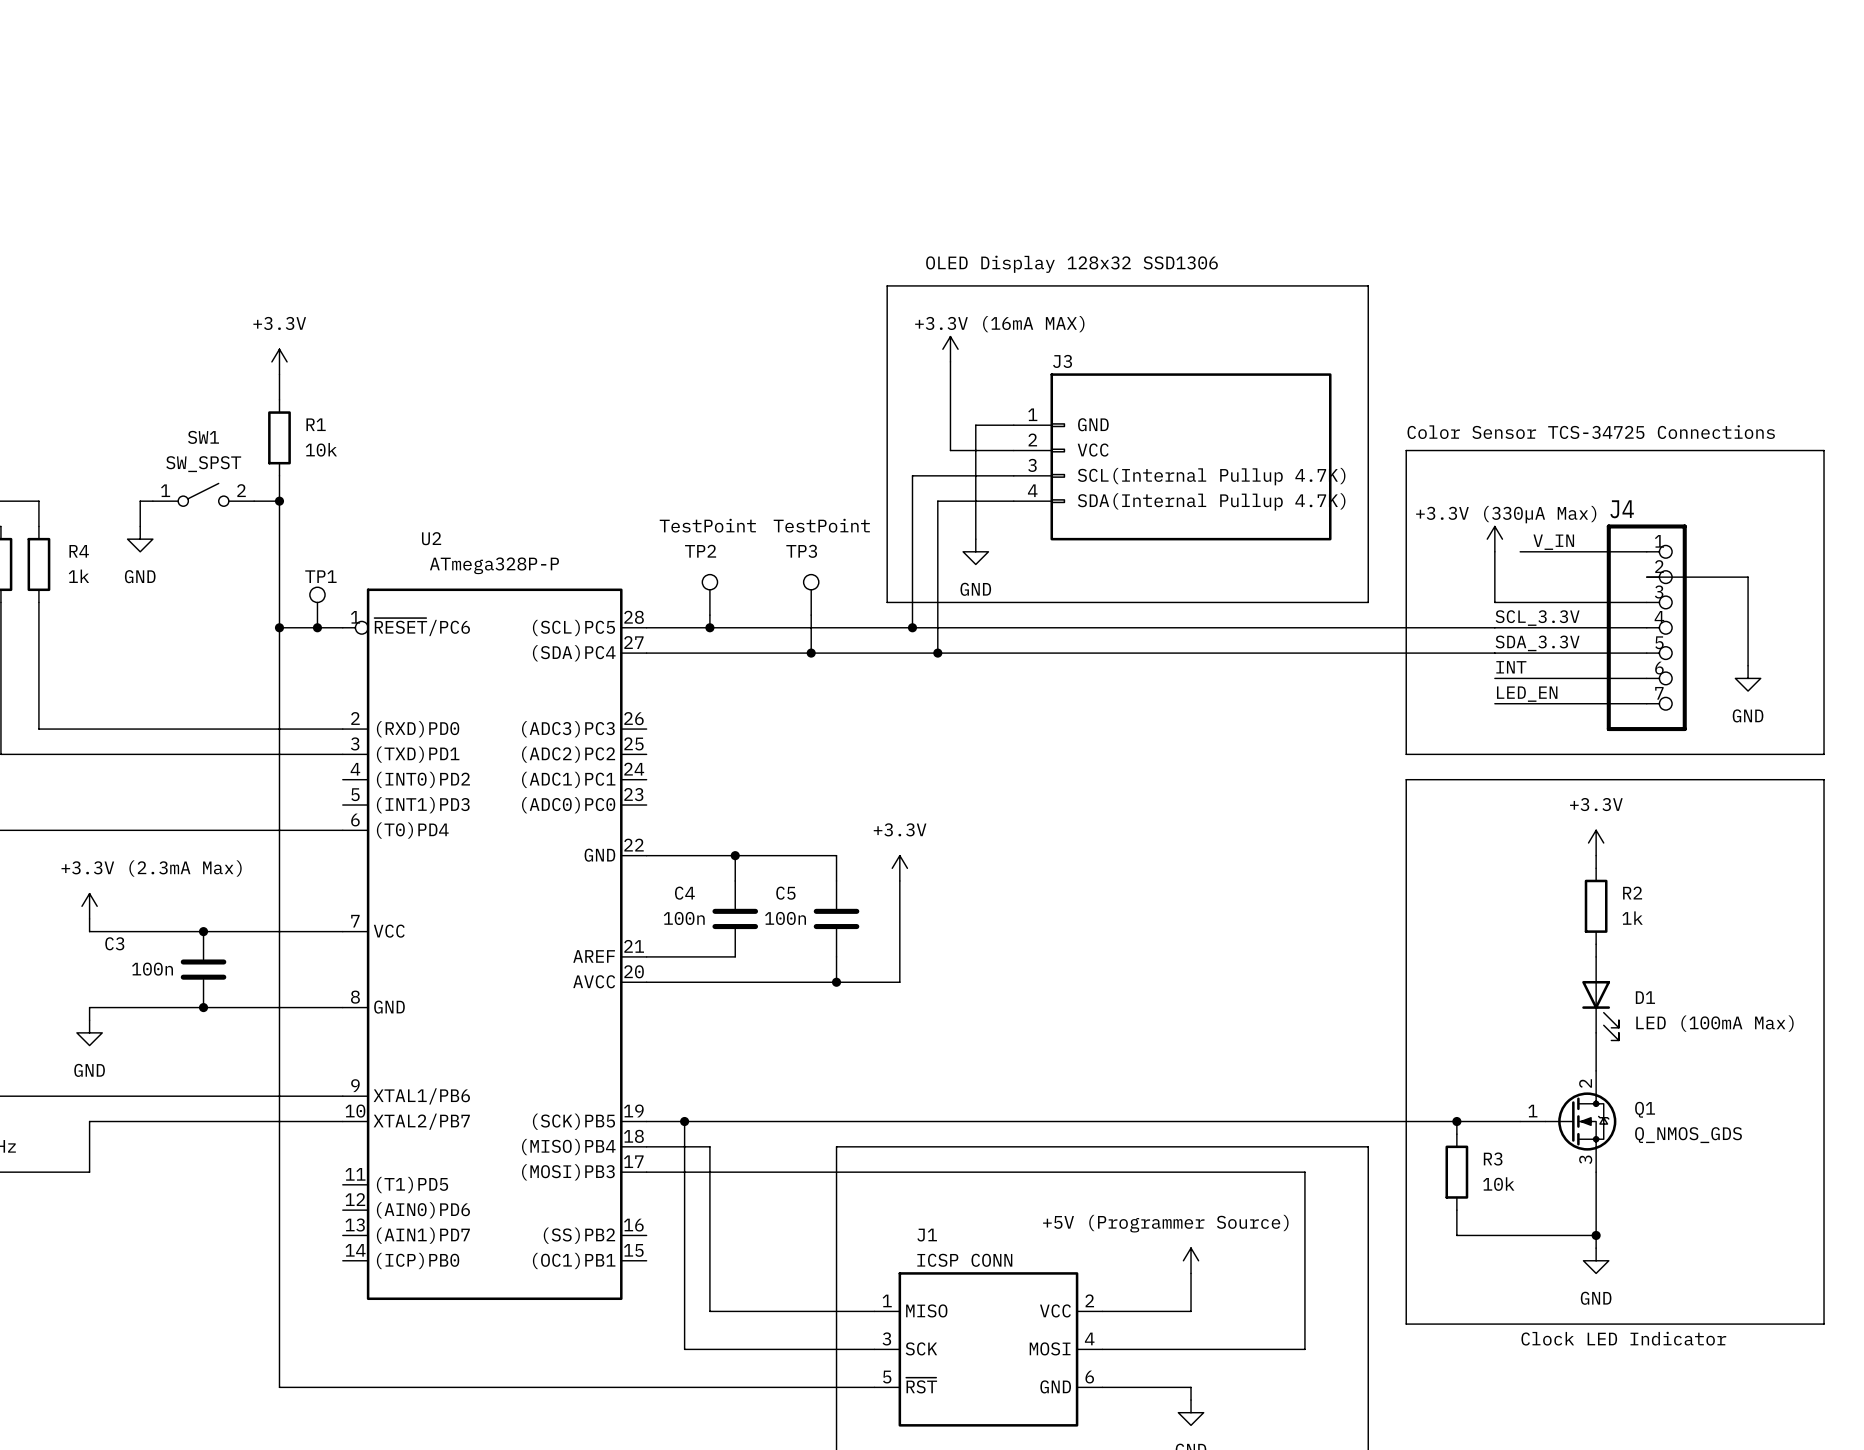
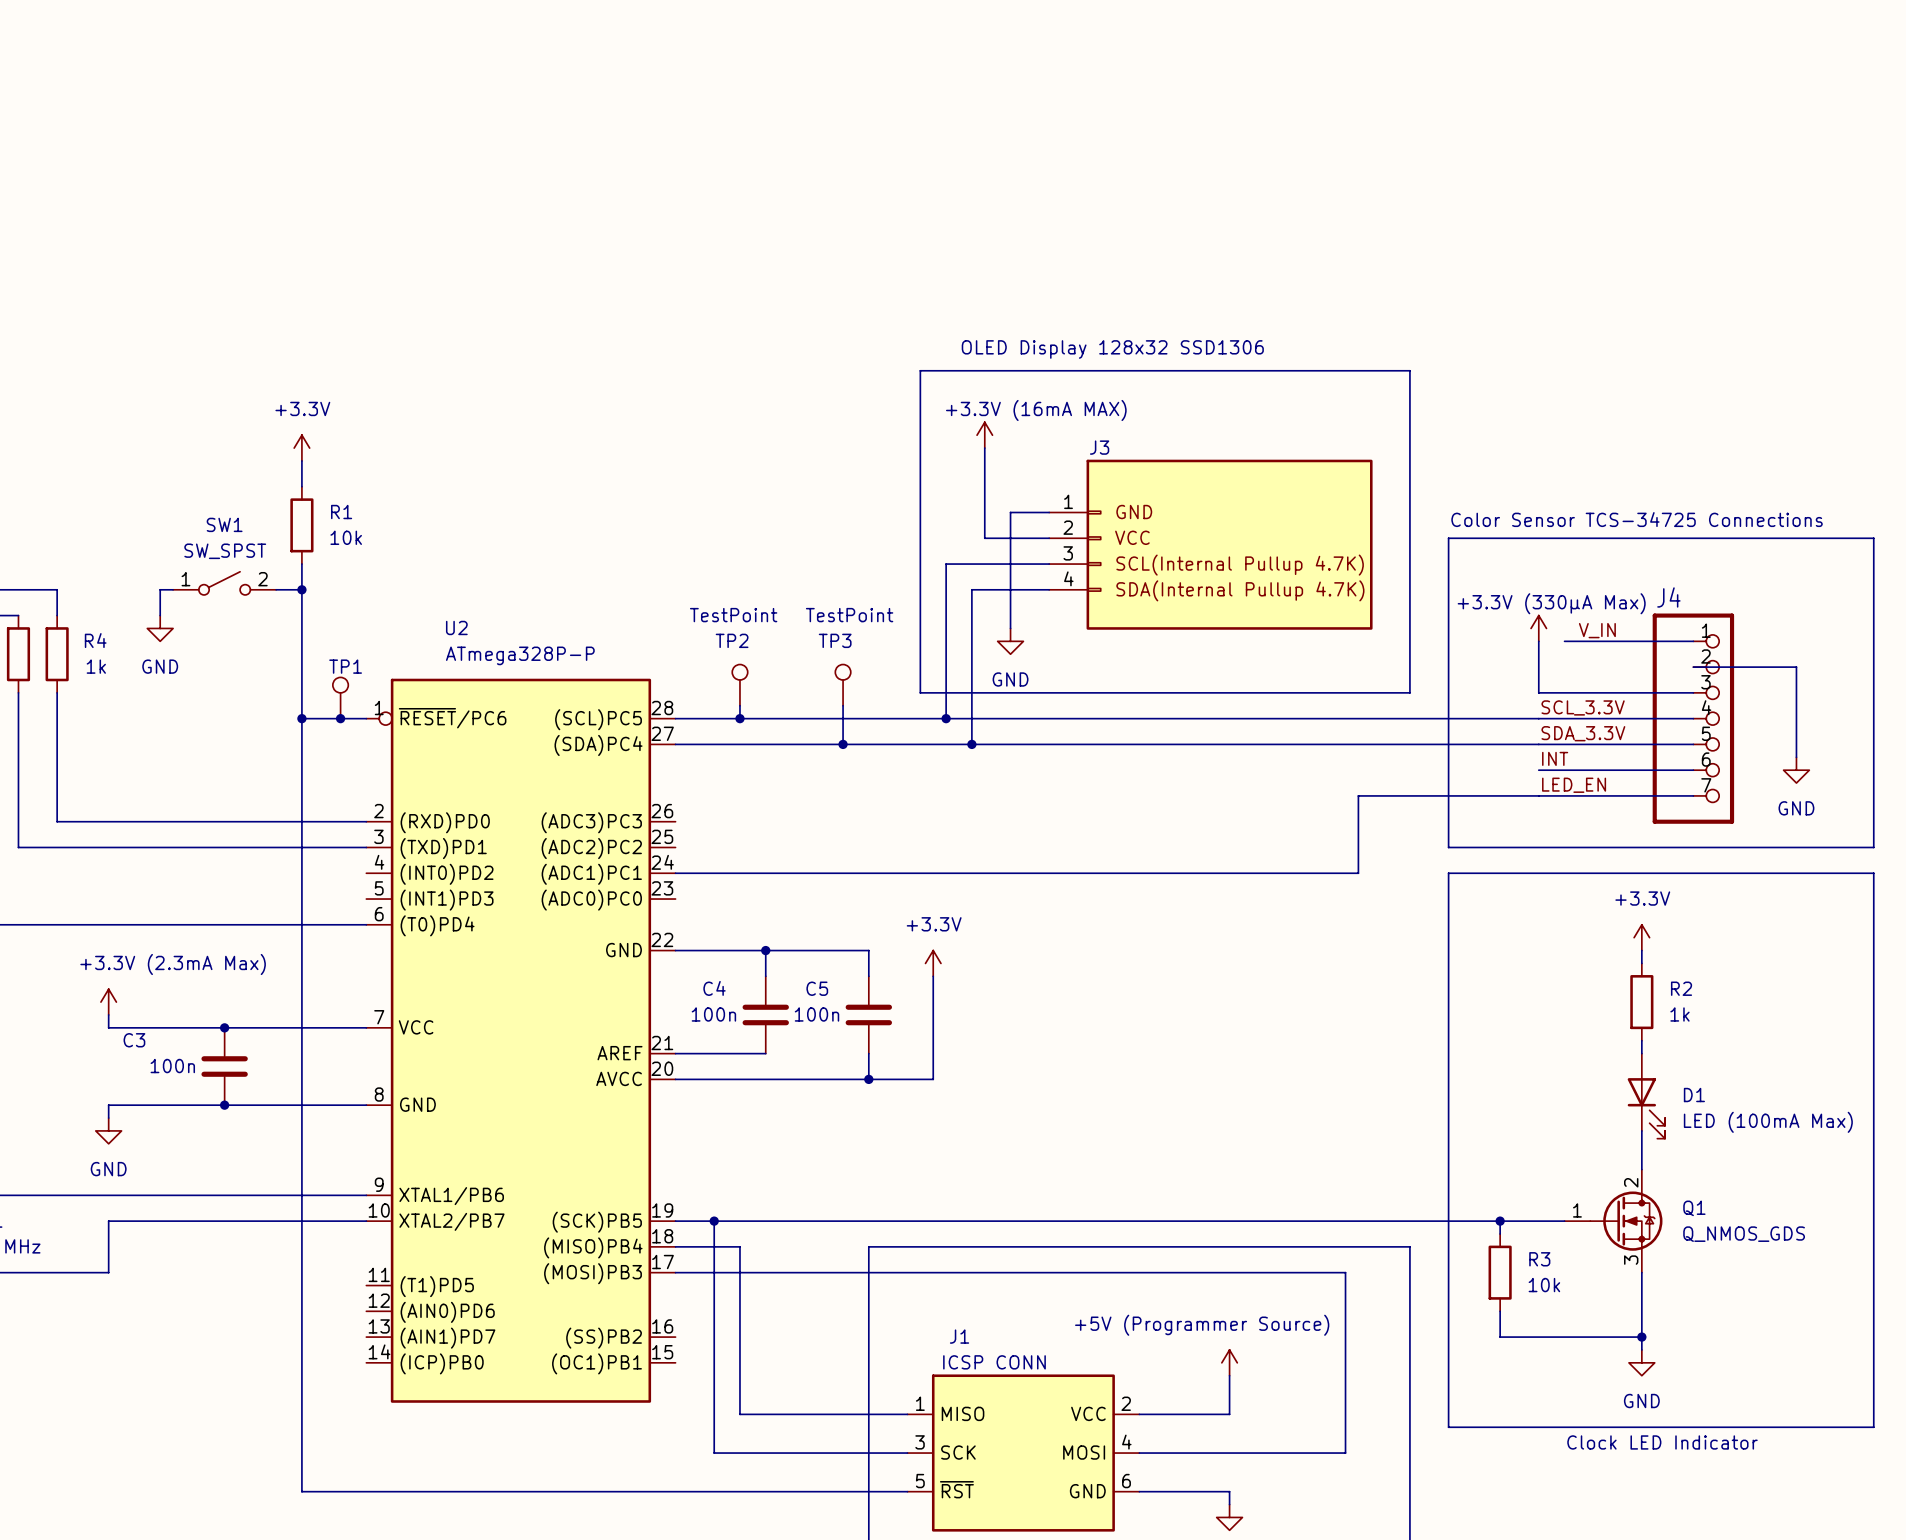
wire: none -> (1538, 795) (1358, 795) (1358, 873) (675, 873)

